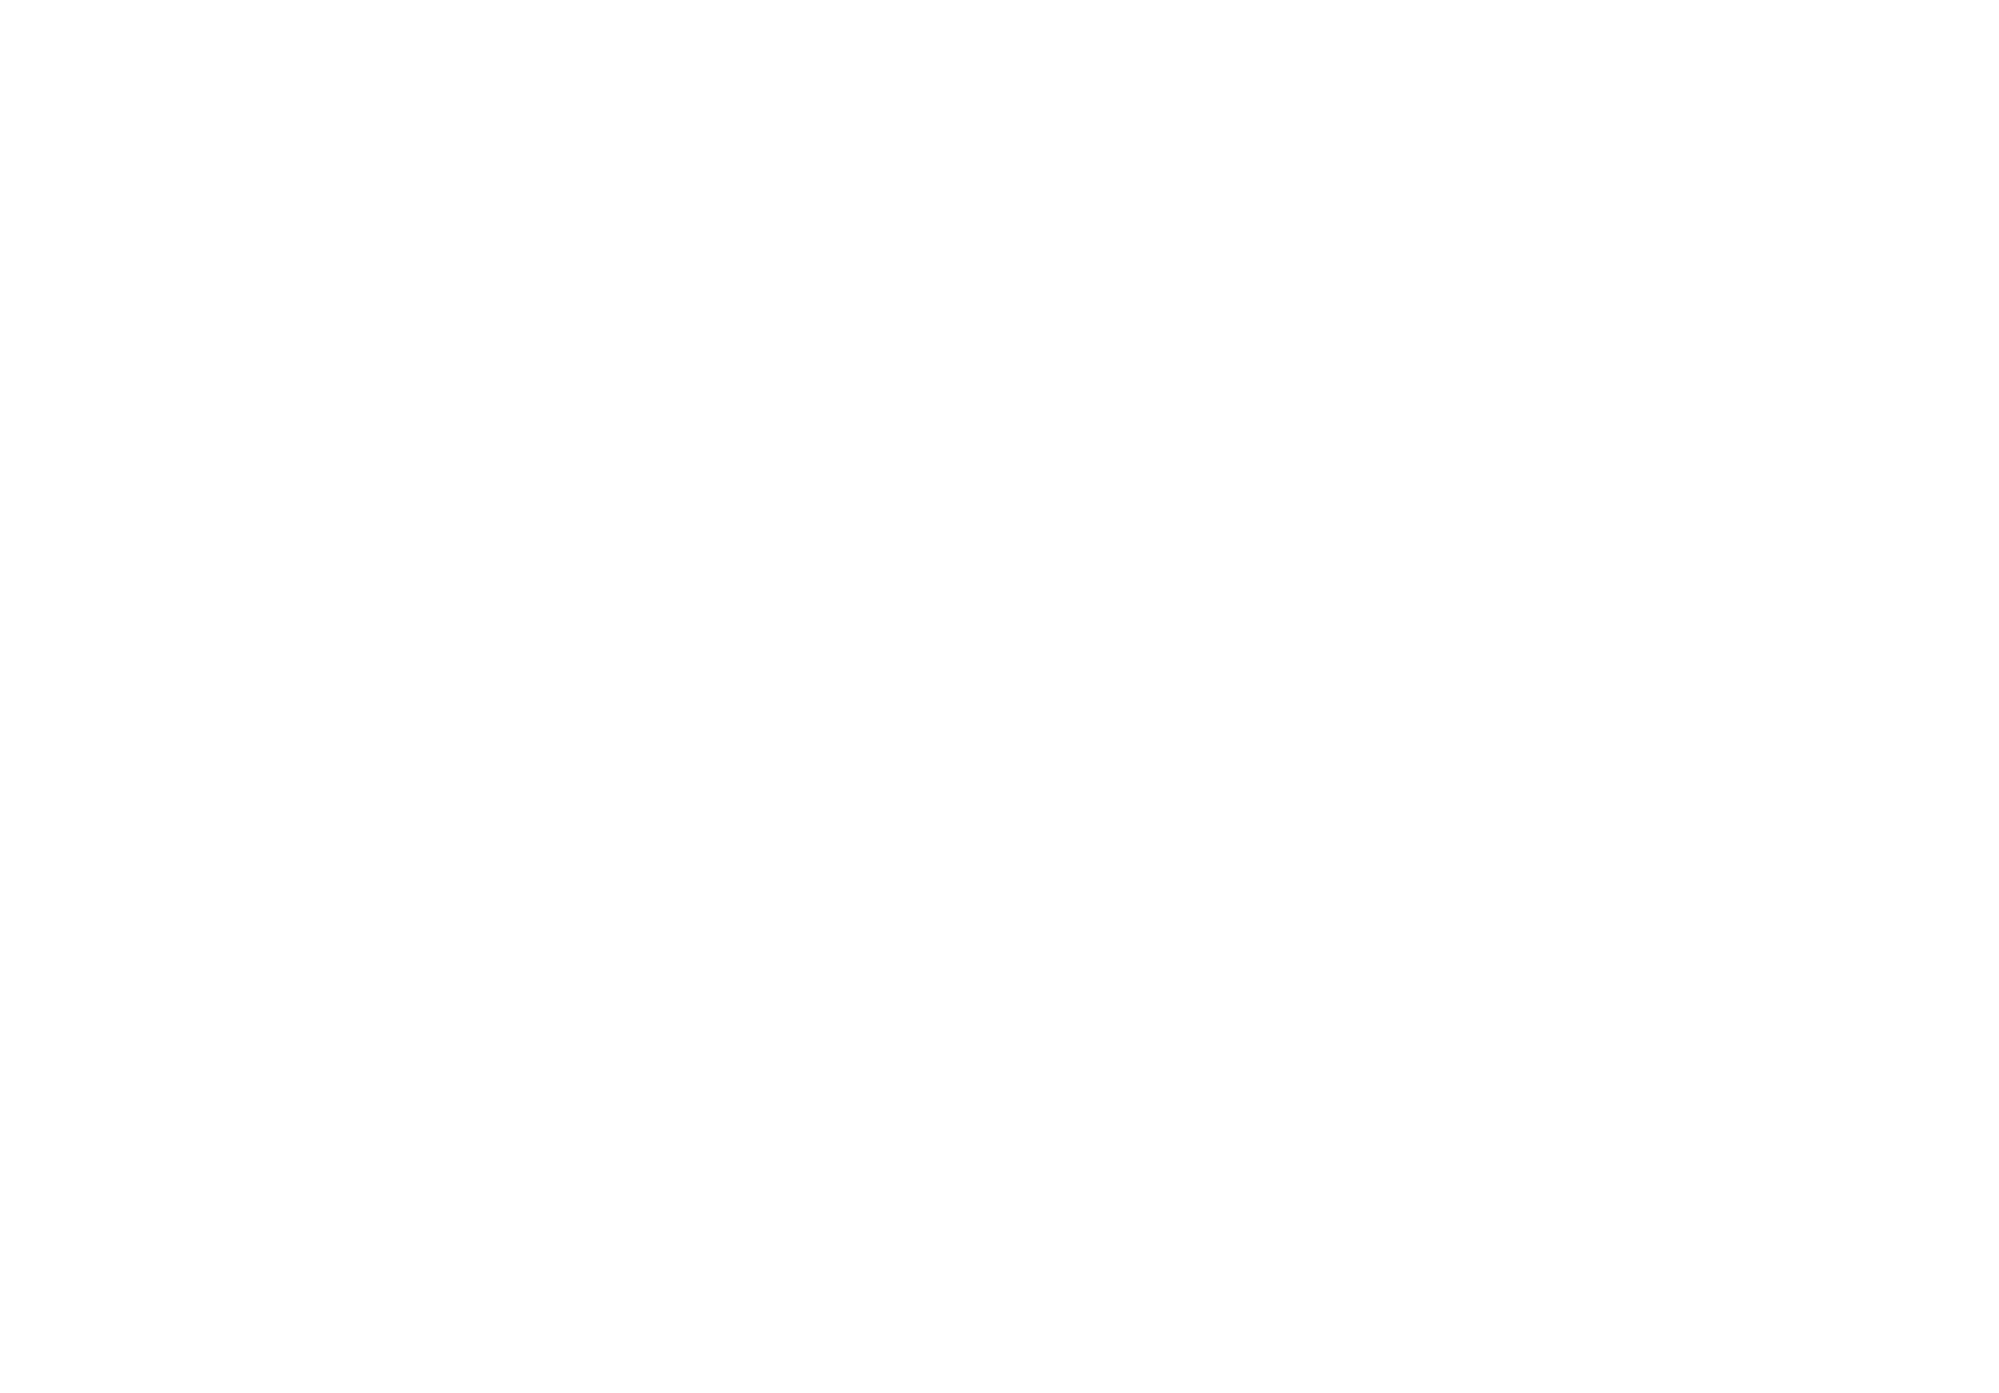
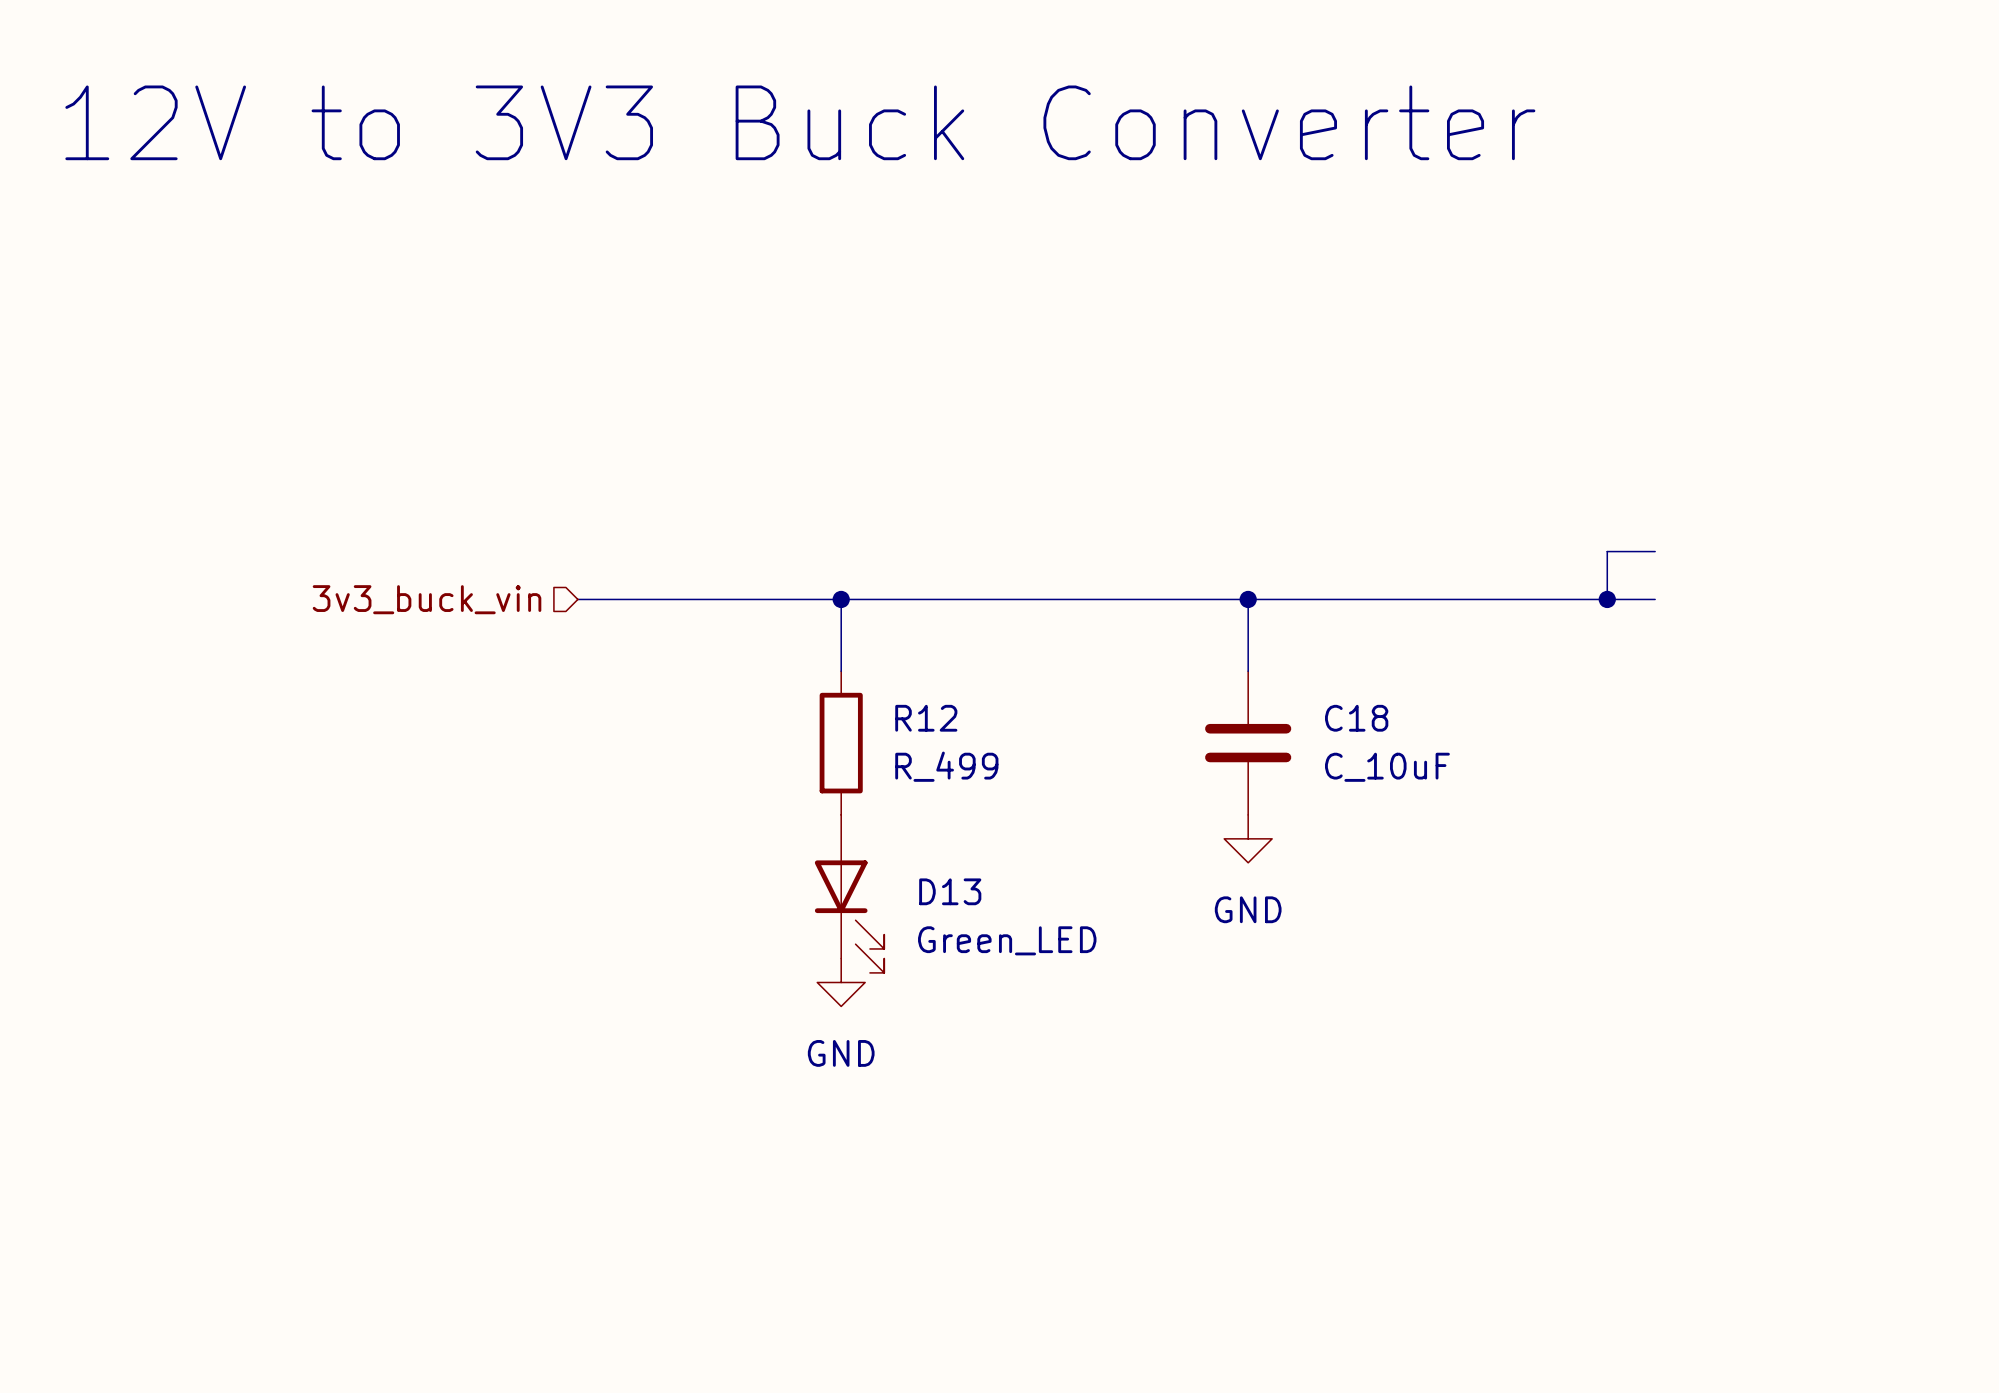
text: none -> 12V to 3V3 Buck Converter (800, 122)
wire: none -> (1655, 551) (1607, 551) (1607, 599)
hierarchical label: none -> 3v3_buck_vin (427, 599)
wire: none -> (577, 599) (1655, 599)
wire: none -> (841, 599) (841, 671)
junction: none -> (841, 599)
wire: none -> (1248, 599) (1248, 671)
junction: none -> (1248, 599)
junction: none -> (1607, 599)
R12: none -> R_499 (841, 743)
C18: none -> C_10uF (1248, 743)
power symbol: none -> GND (1248, 838)
D13: none -> Green_LED (849, 893)
power symbol: none -> GND (841, 982)

